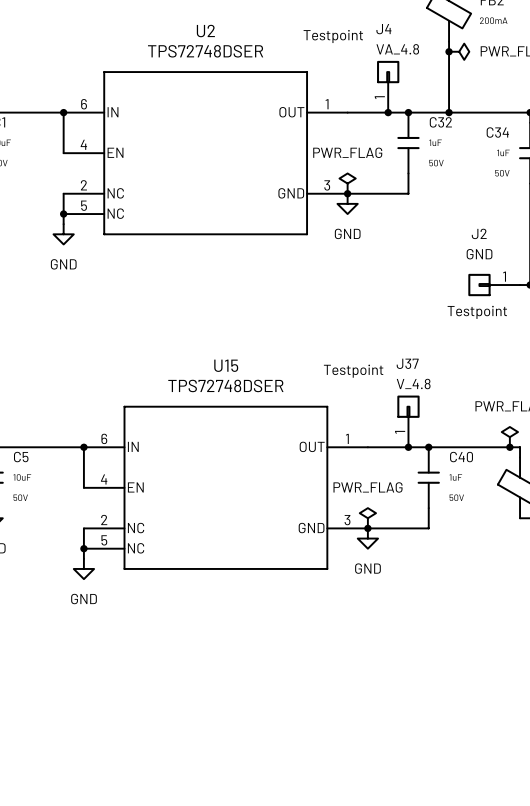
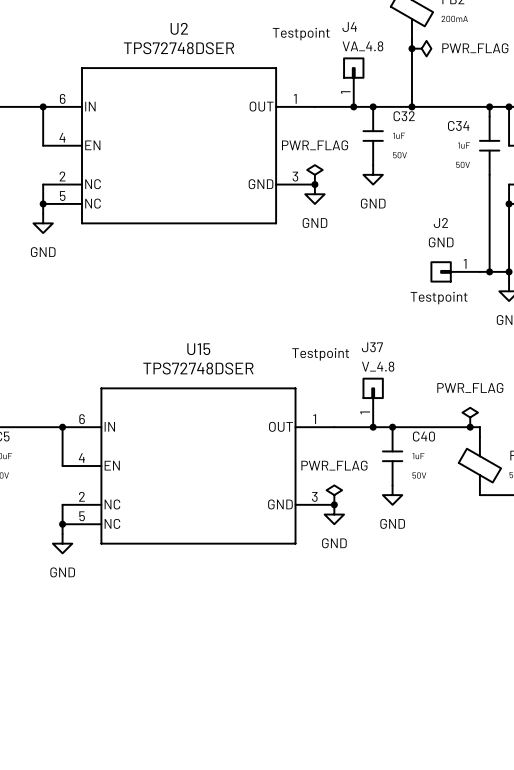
wire: (408, 173) (408, 193) (347, 193) -> none
power symbol: none -> GND (373, 174)
wire: (428, 508) (428, 528) (367, 528) -> none
power symbol: none -> GND (392, 495)

